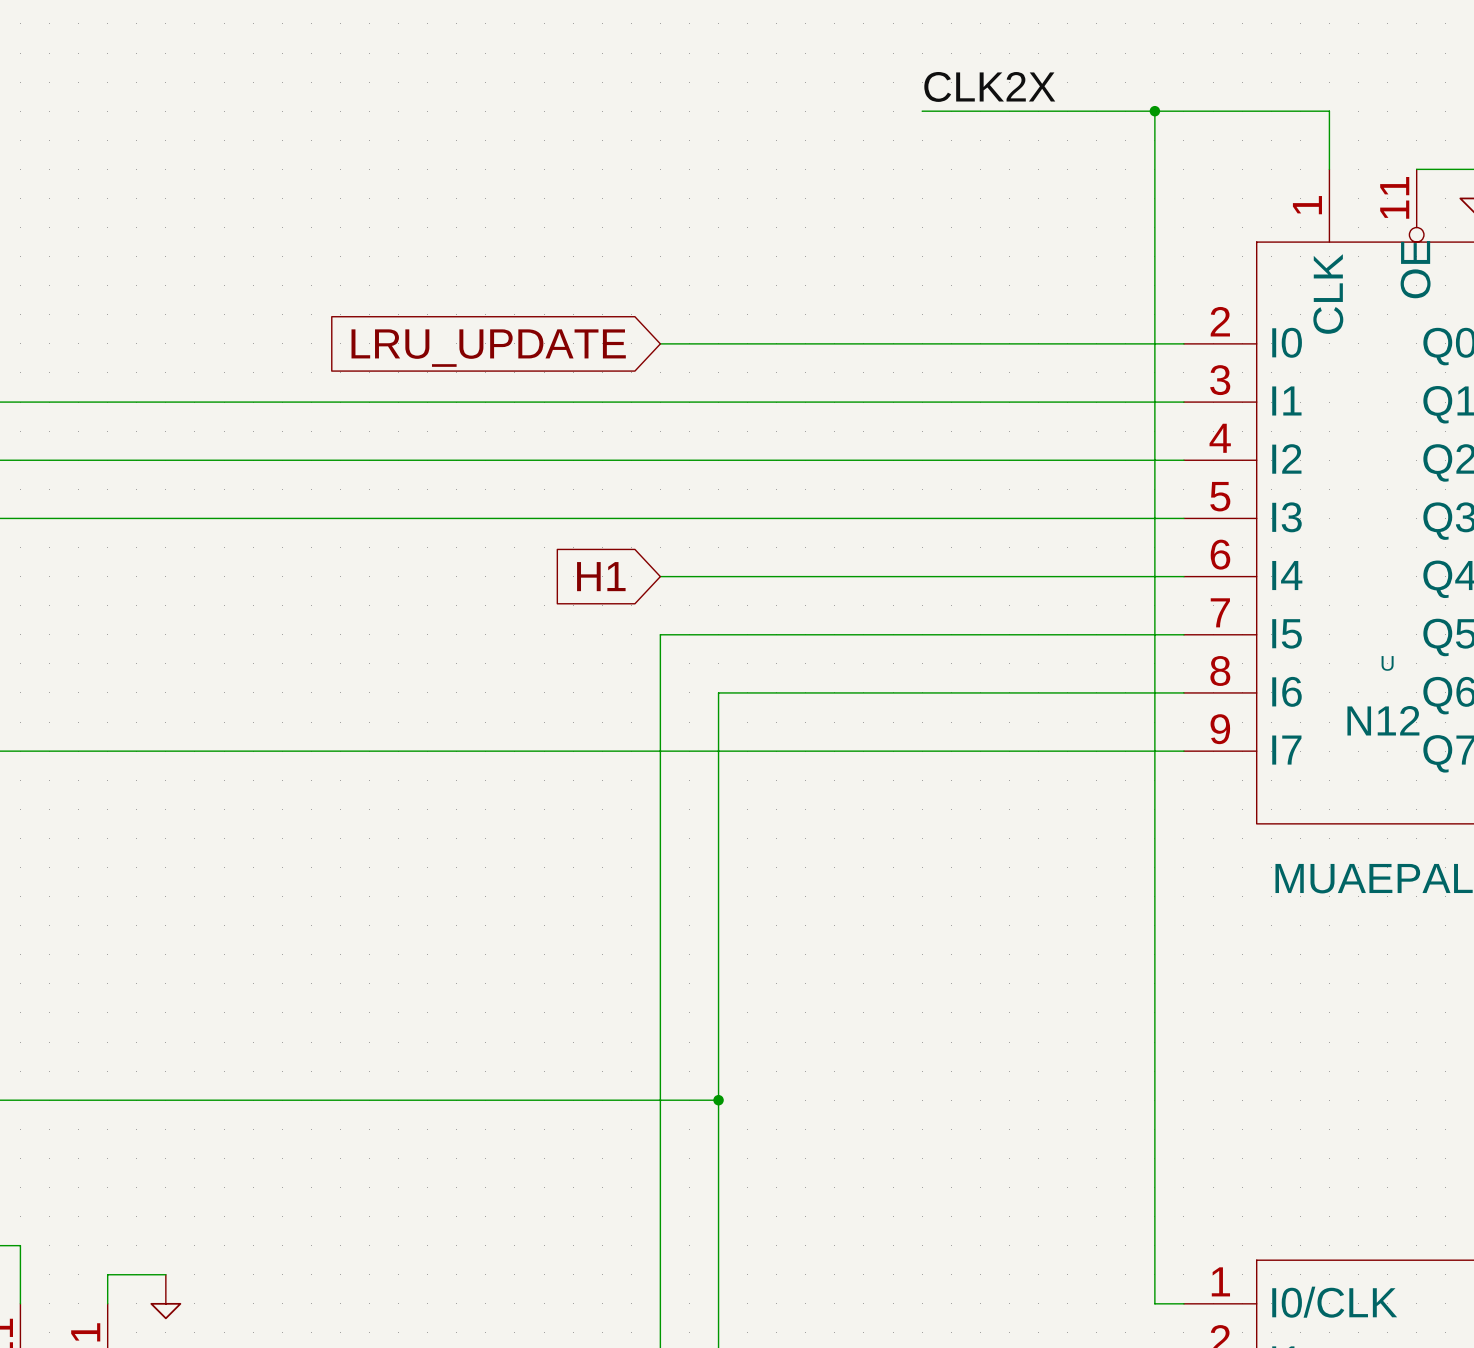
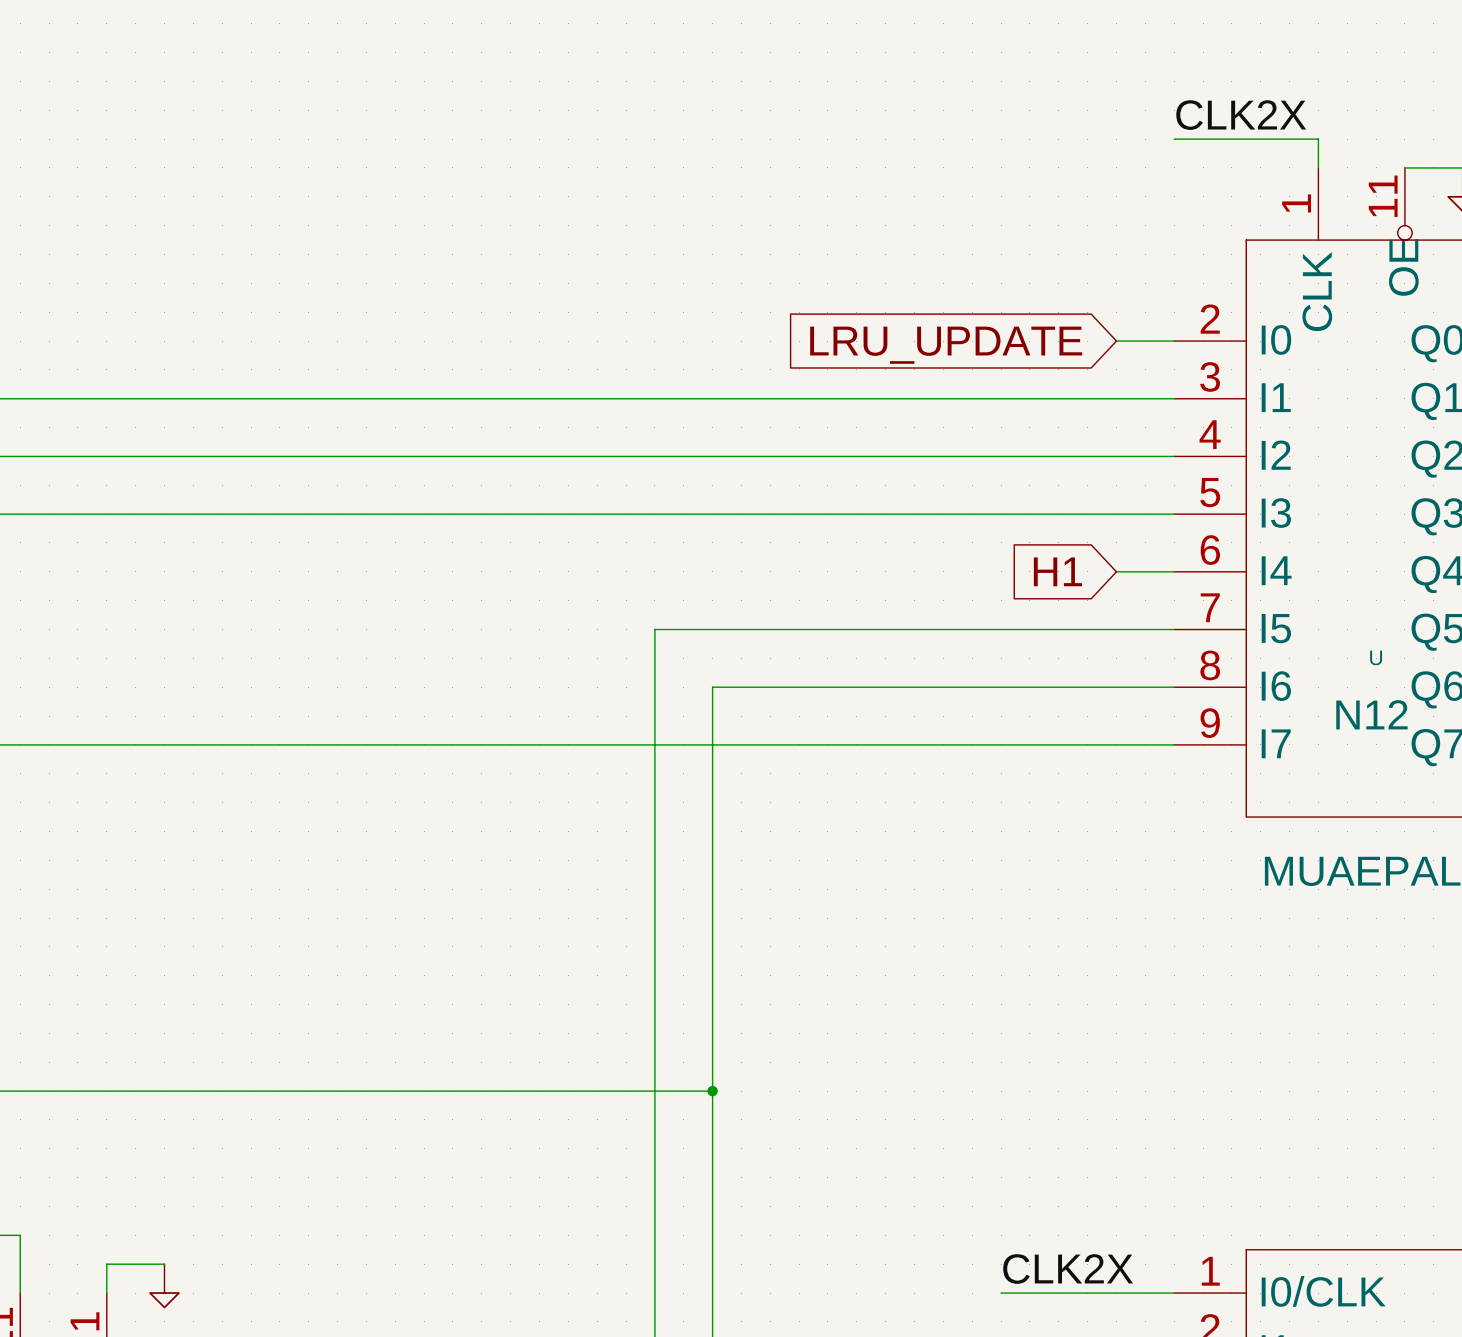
label position: CLK2X (989, 86) -> CLK2X (1241, 115)
wire: (922, 111) (1329, 111) (1329, 140) -> (1174, 139) (1318, 139)
wire: (1154, 111) (1154, 1303) -> (1001, 1293) (1145, 1293)
junction: (1154, 111) -> none
wire: (660, 343) (1125, 343) -> none
global label: LRU_UPDATE (488, 348) -> none
global label: none -> LRU_UPDATE (946, 345)
global label: H1 (601, 576) -> none
wire: (660, 576) (1125, 576) -> none
global label: none -> H1 (1057, 571)
label: none -> CLK2X (1068, 1269)

